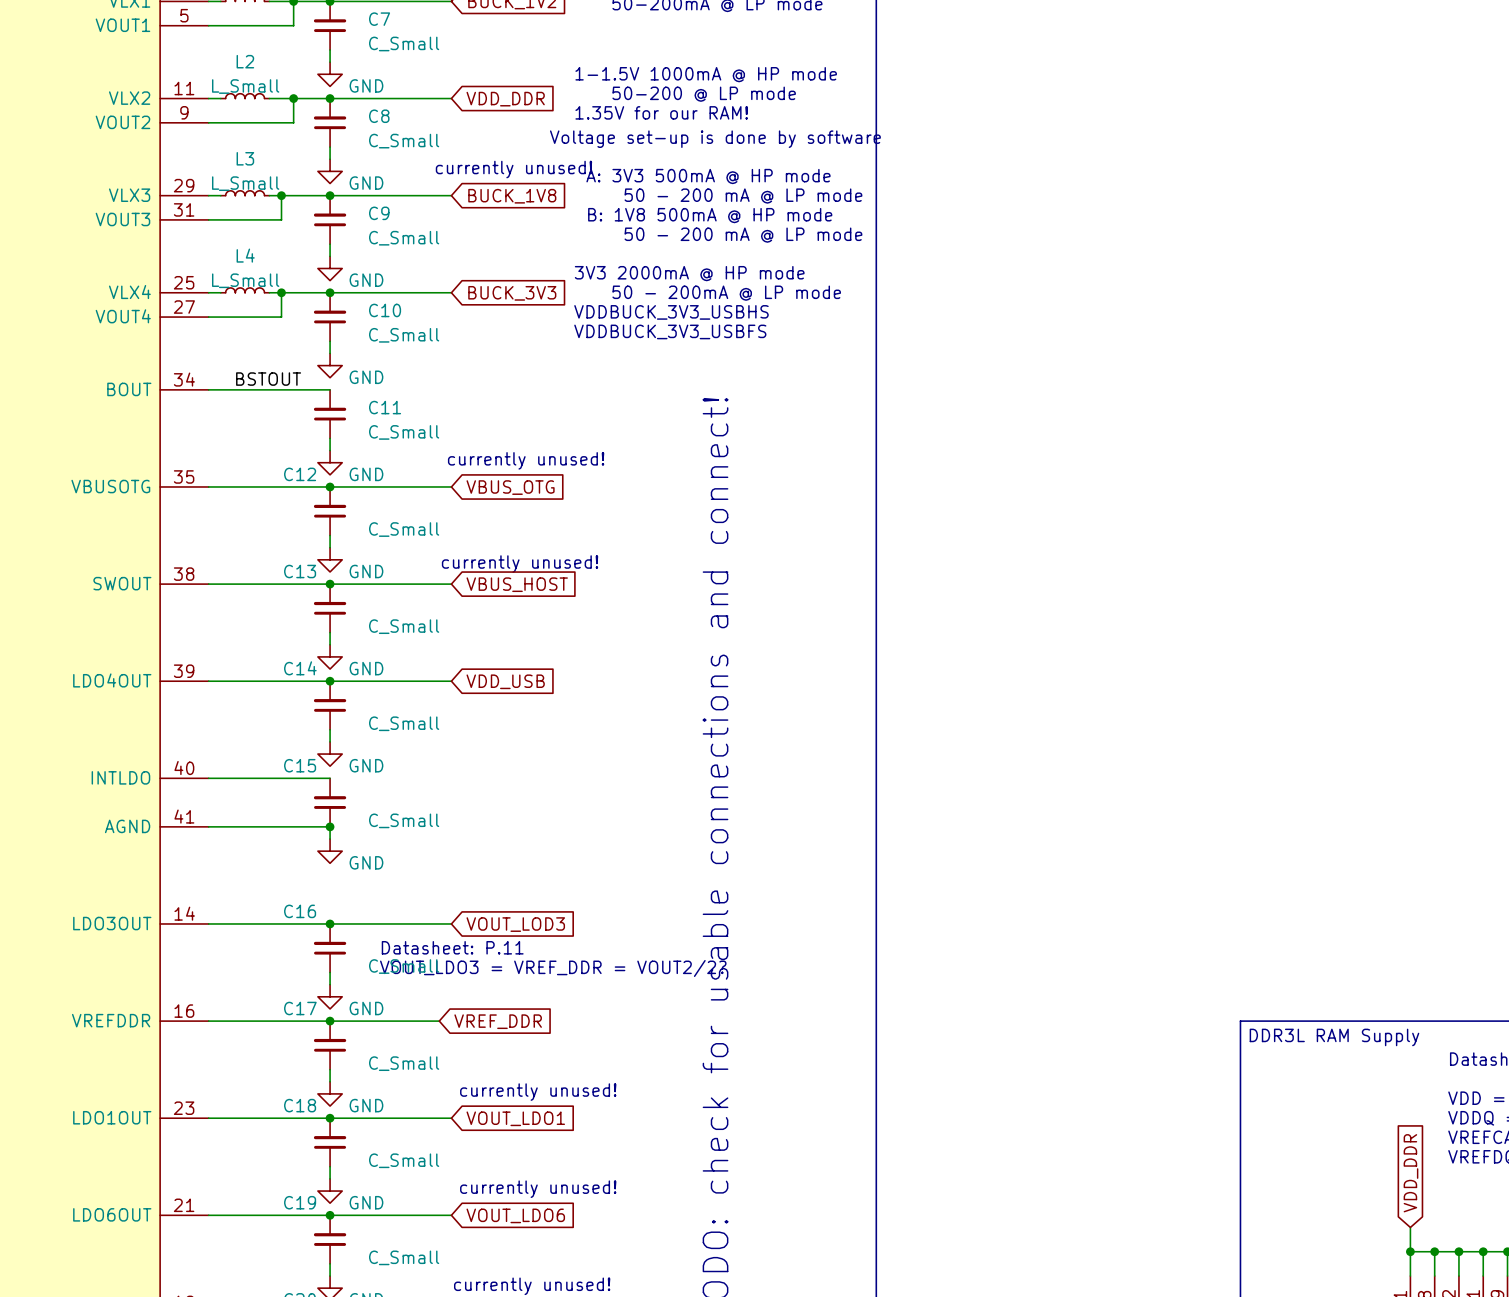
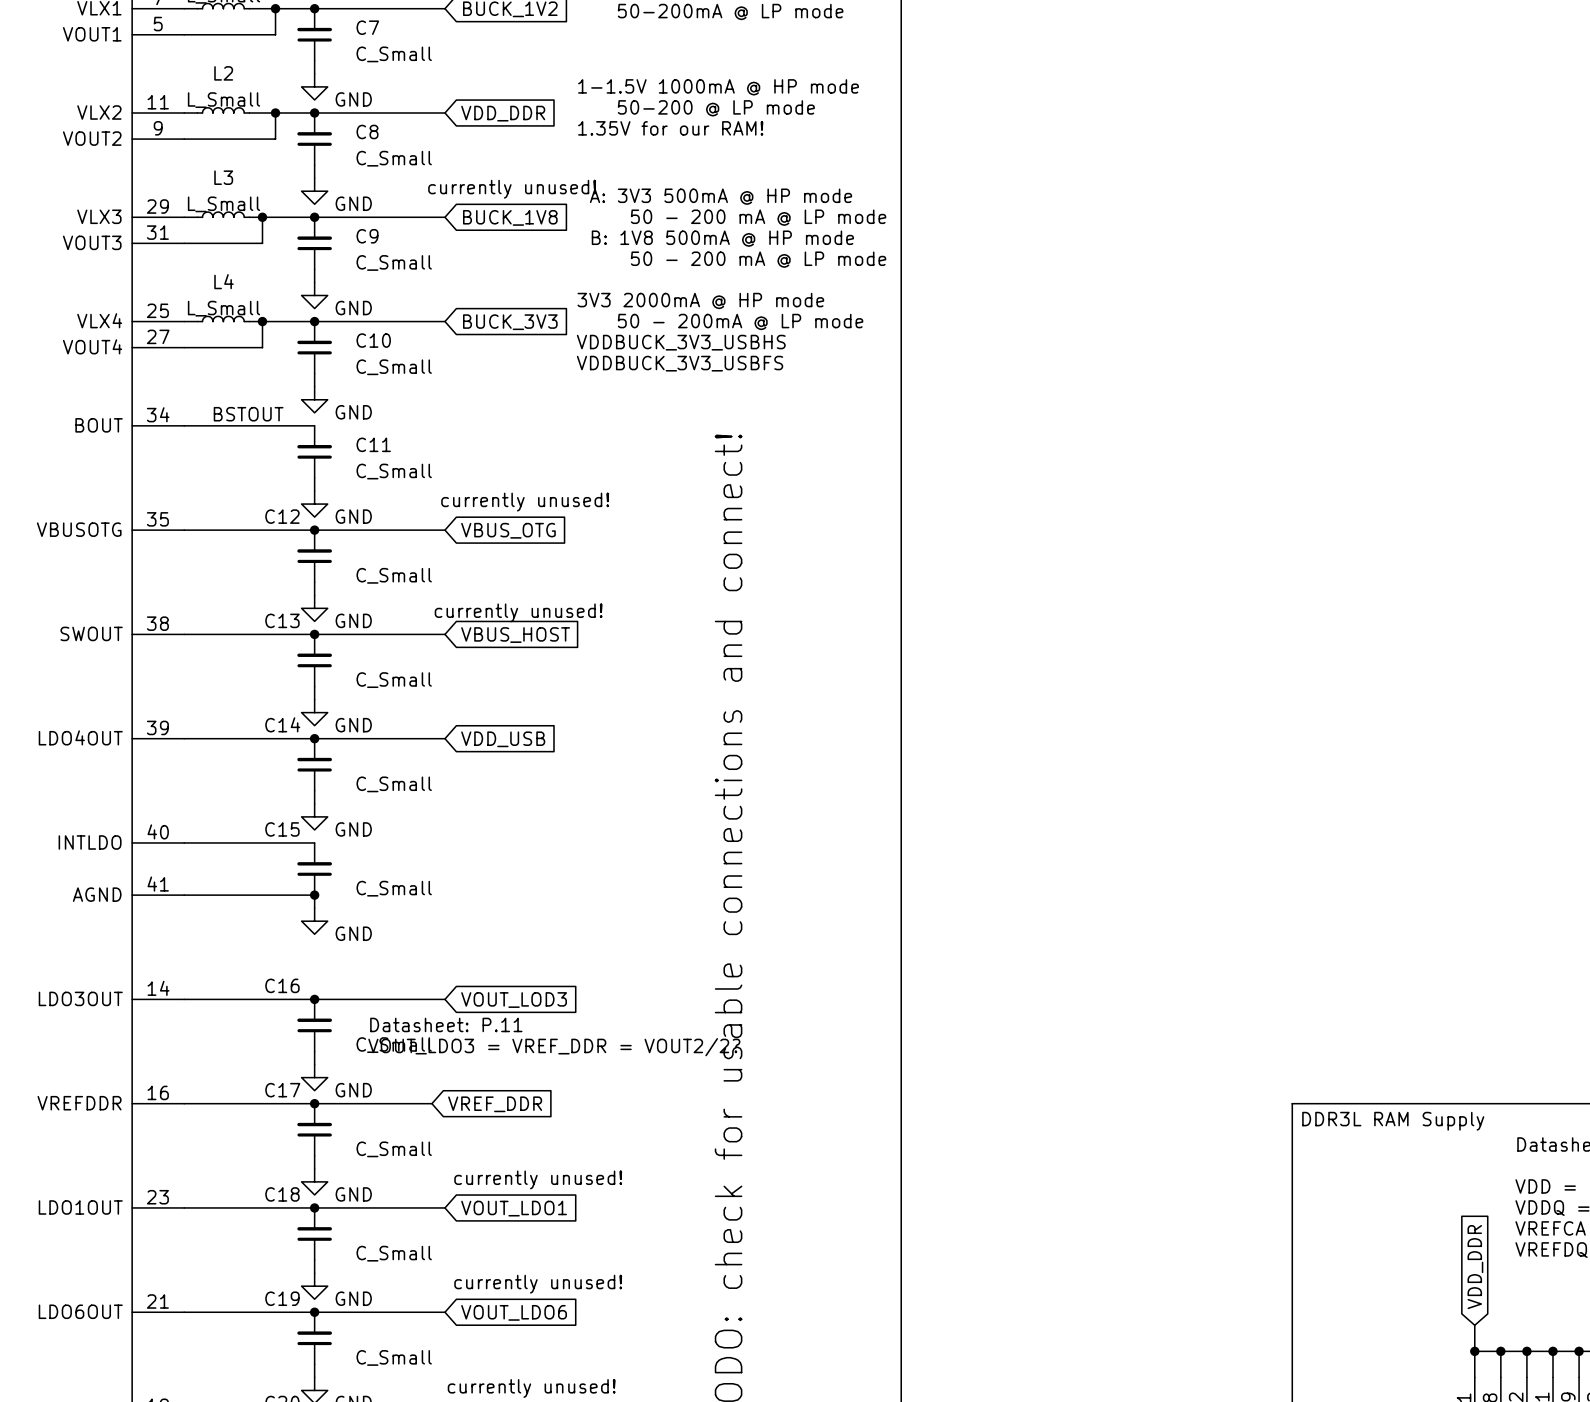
text: Voltage set-up is done by software (715, 139) -> none

